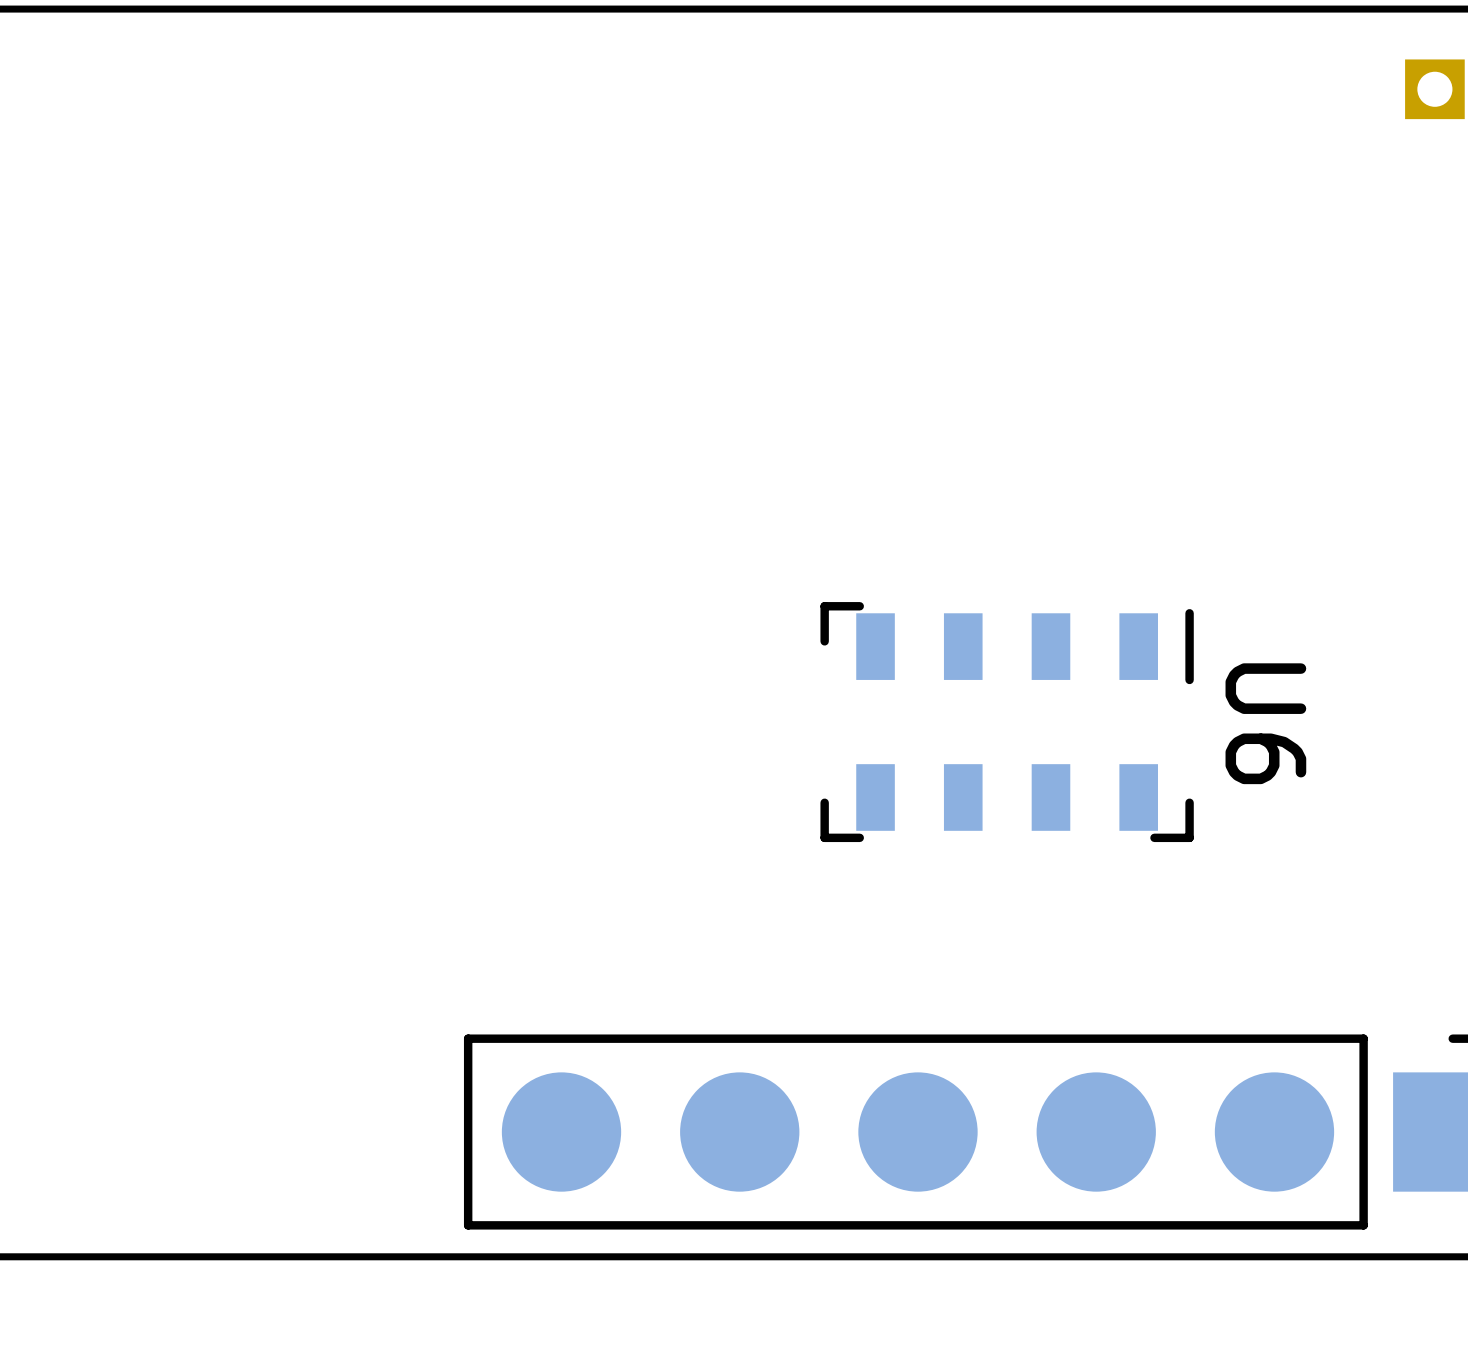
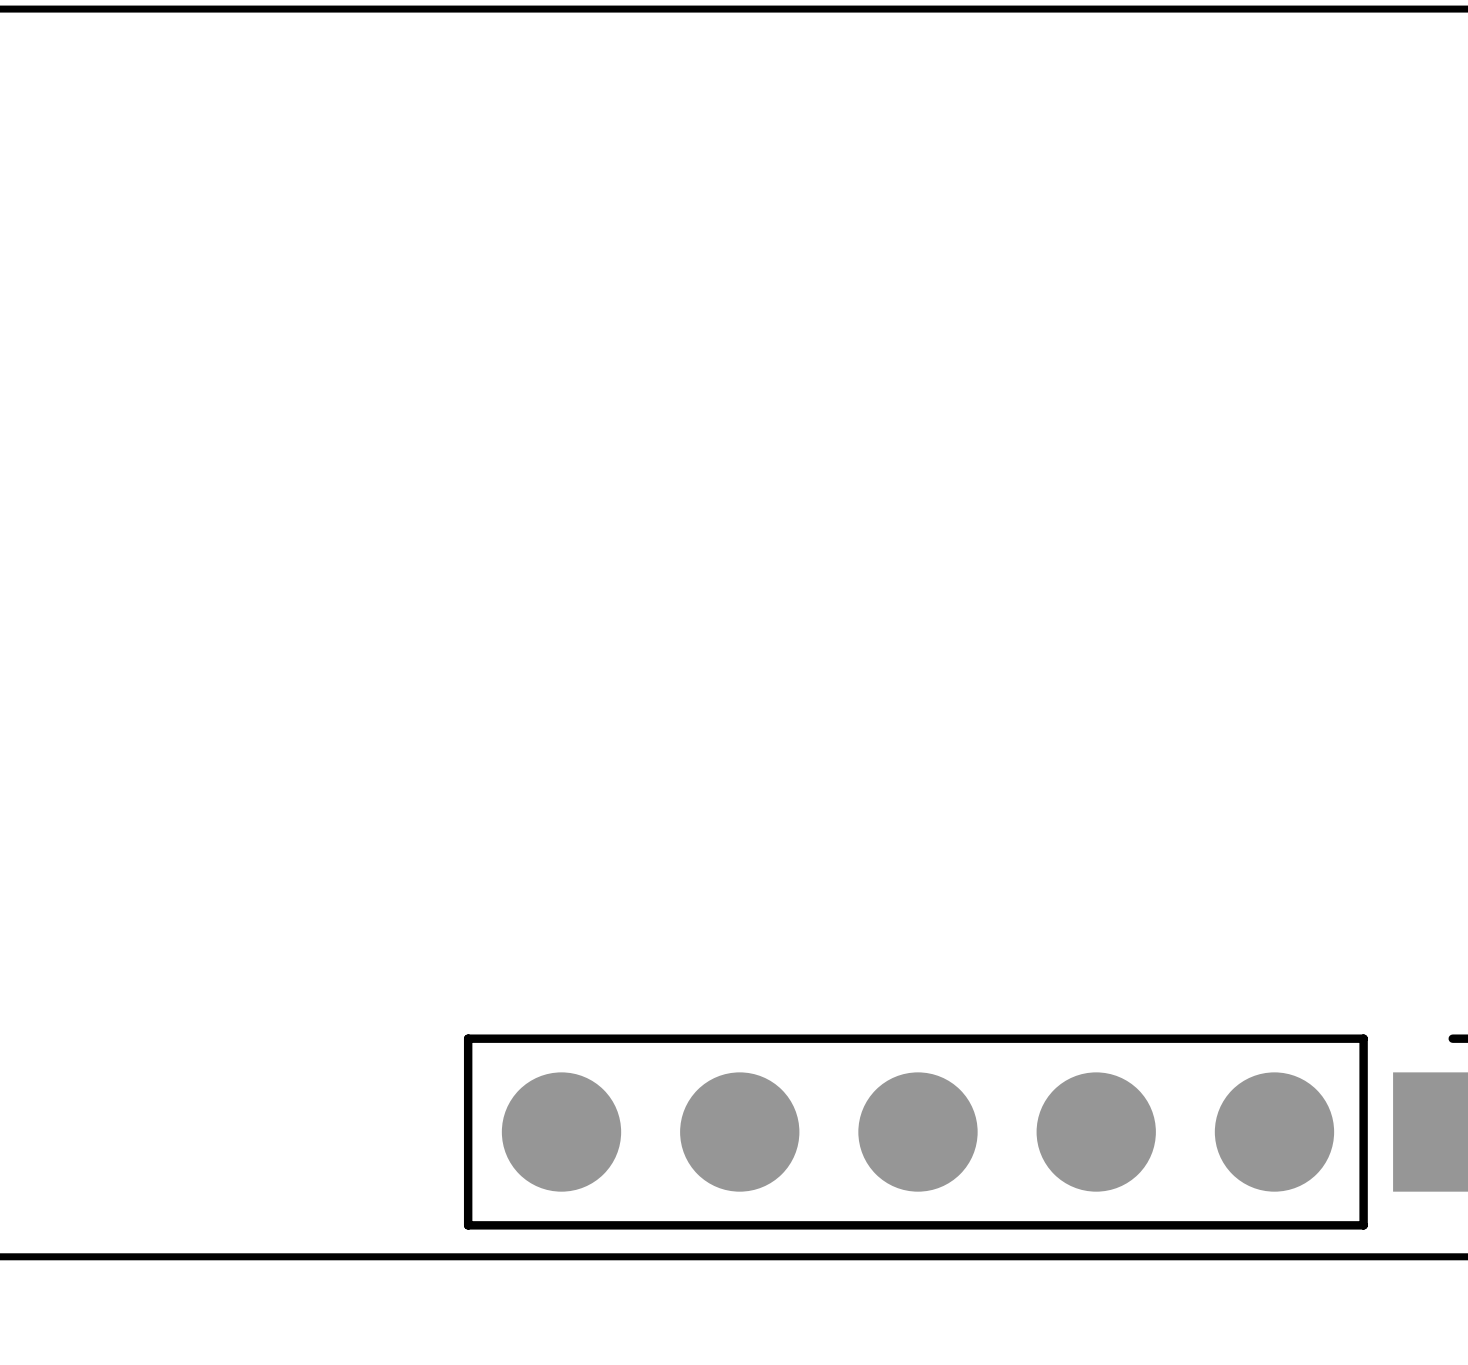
part: (1434, 89) -> none
U6: (1007, 722) -> none

